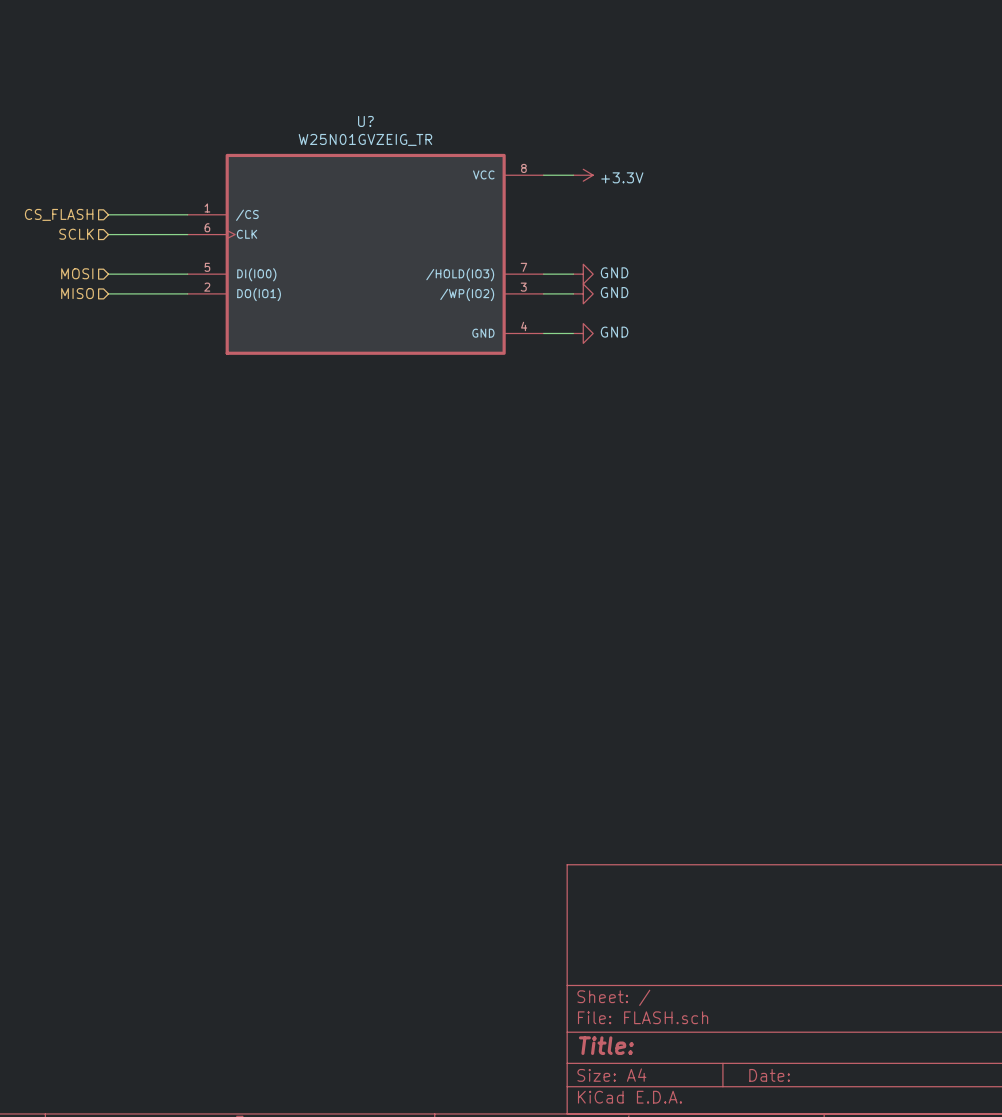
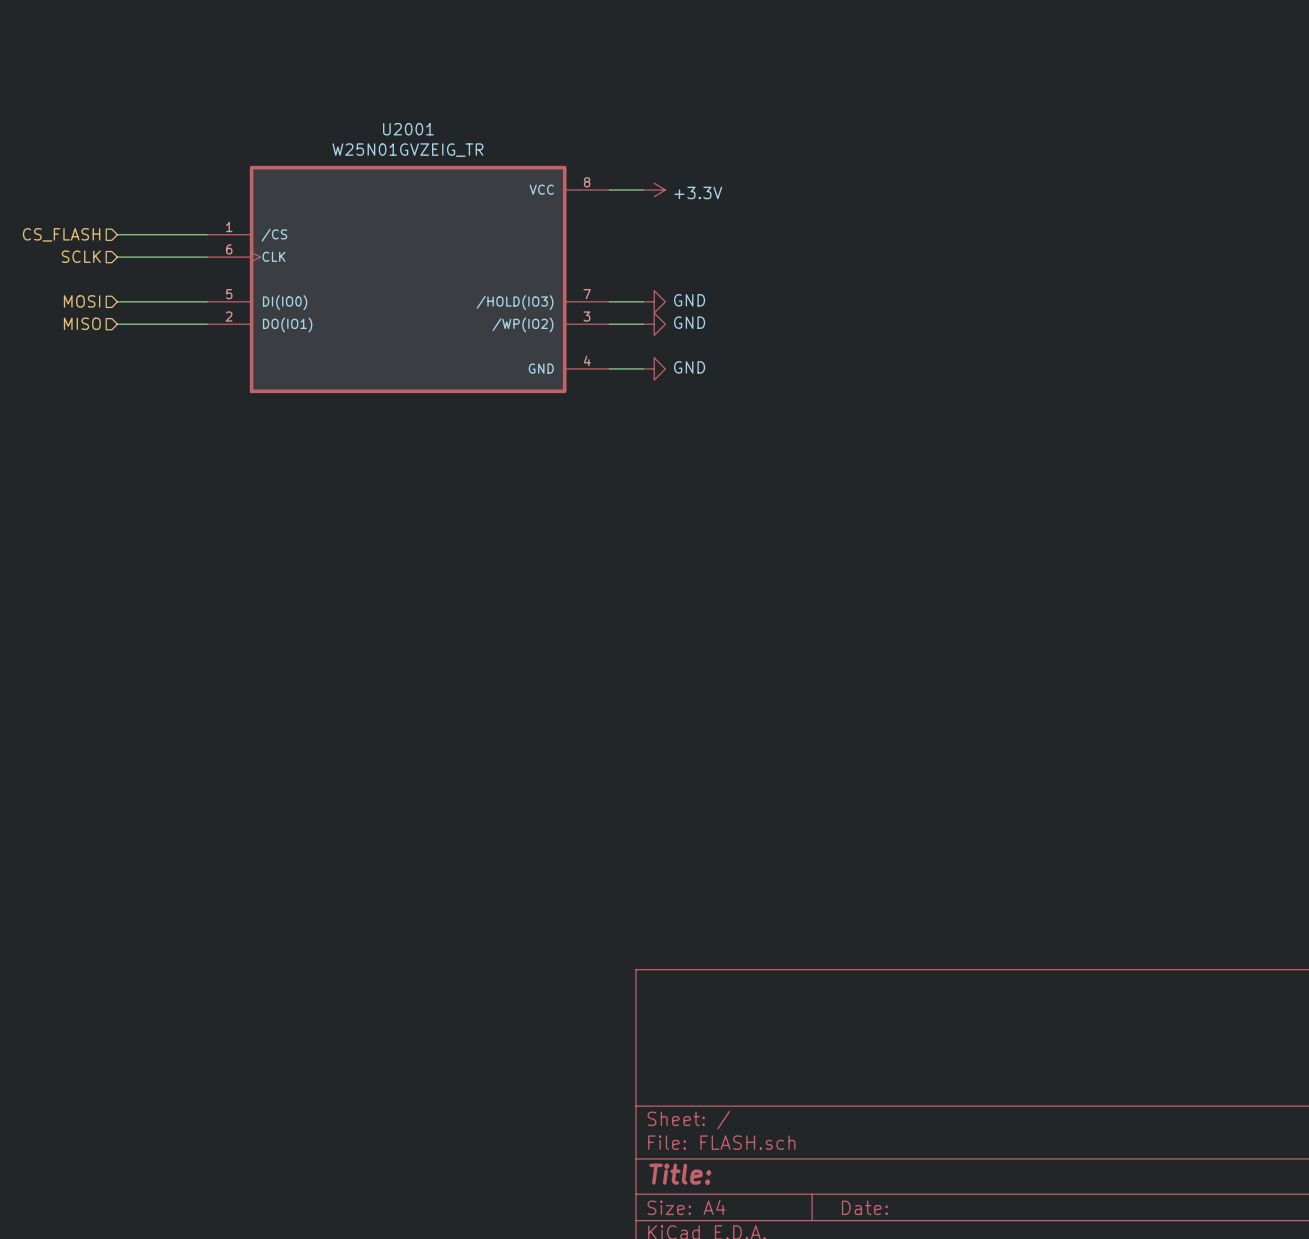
U? name: U? (365, 121) -> U2001 (408, 129)

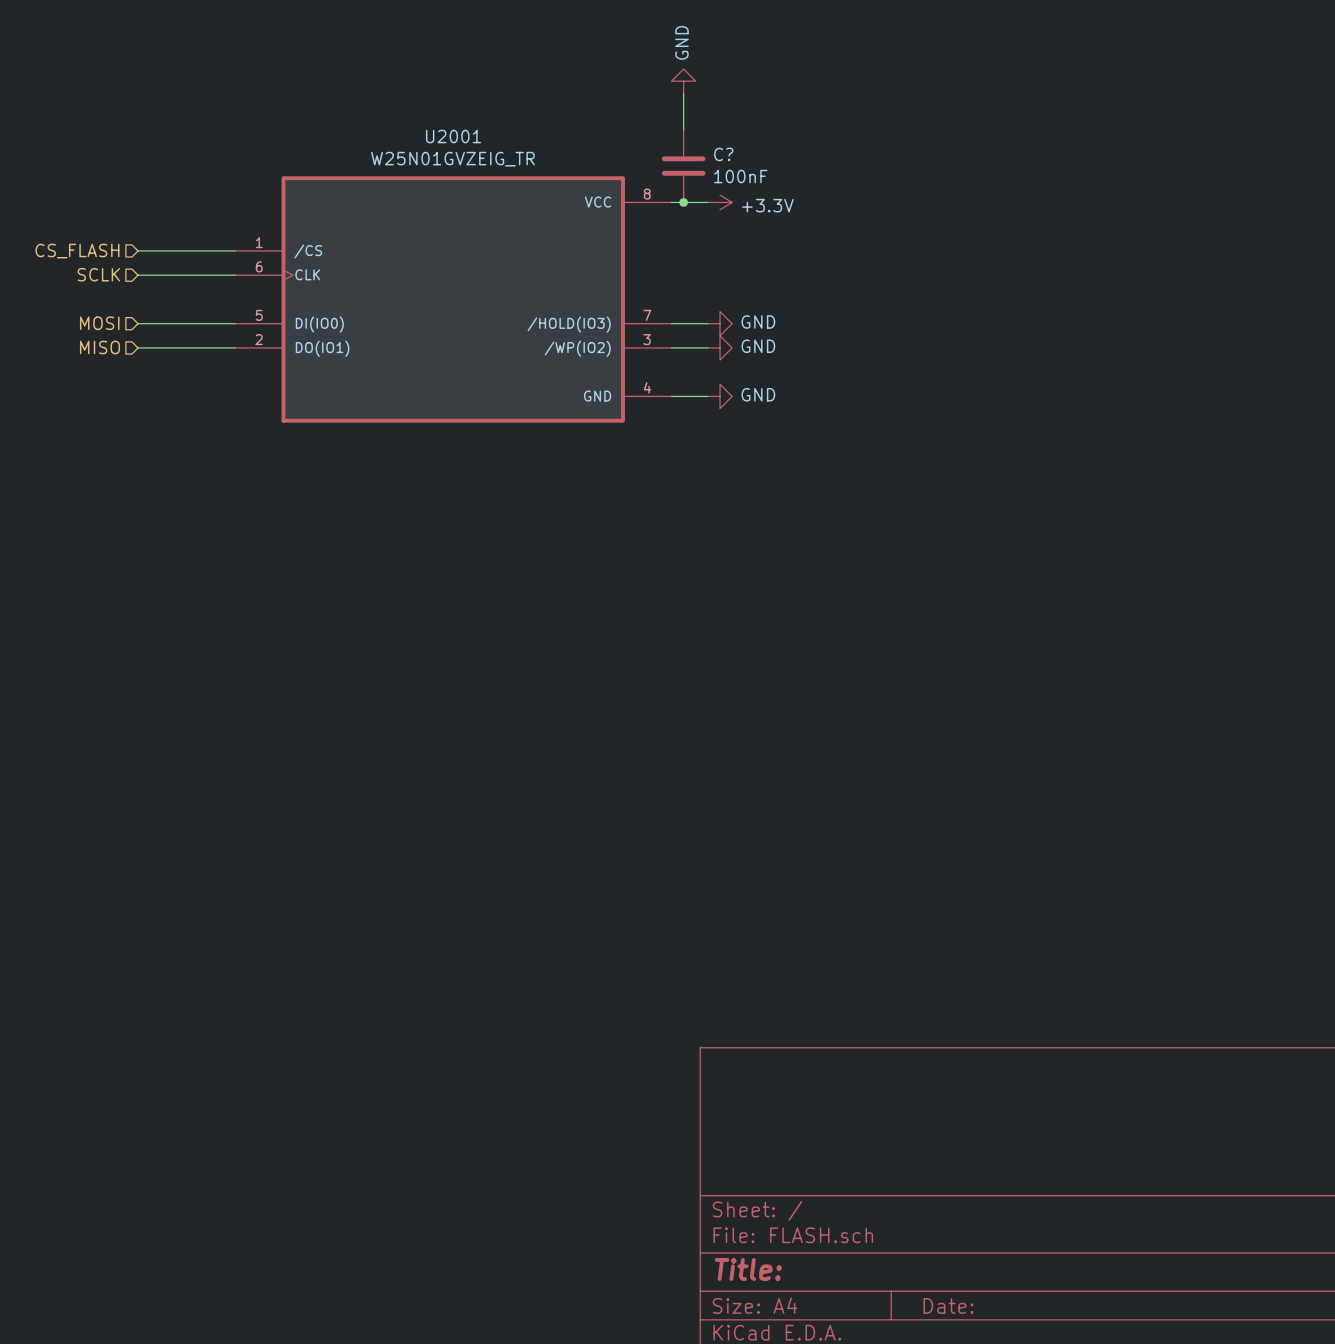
power symbol: none -> GND (683, 81)
wire: none -> (683, 93) (683, 129)
C?: none -> 100nF (683, 166)
junction: none -> (683, 202)

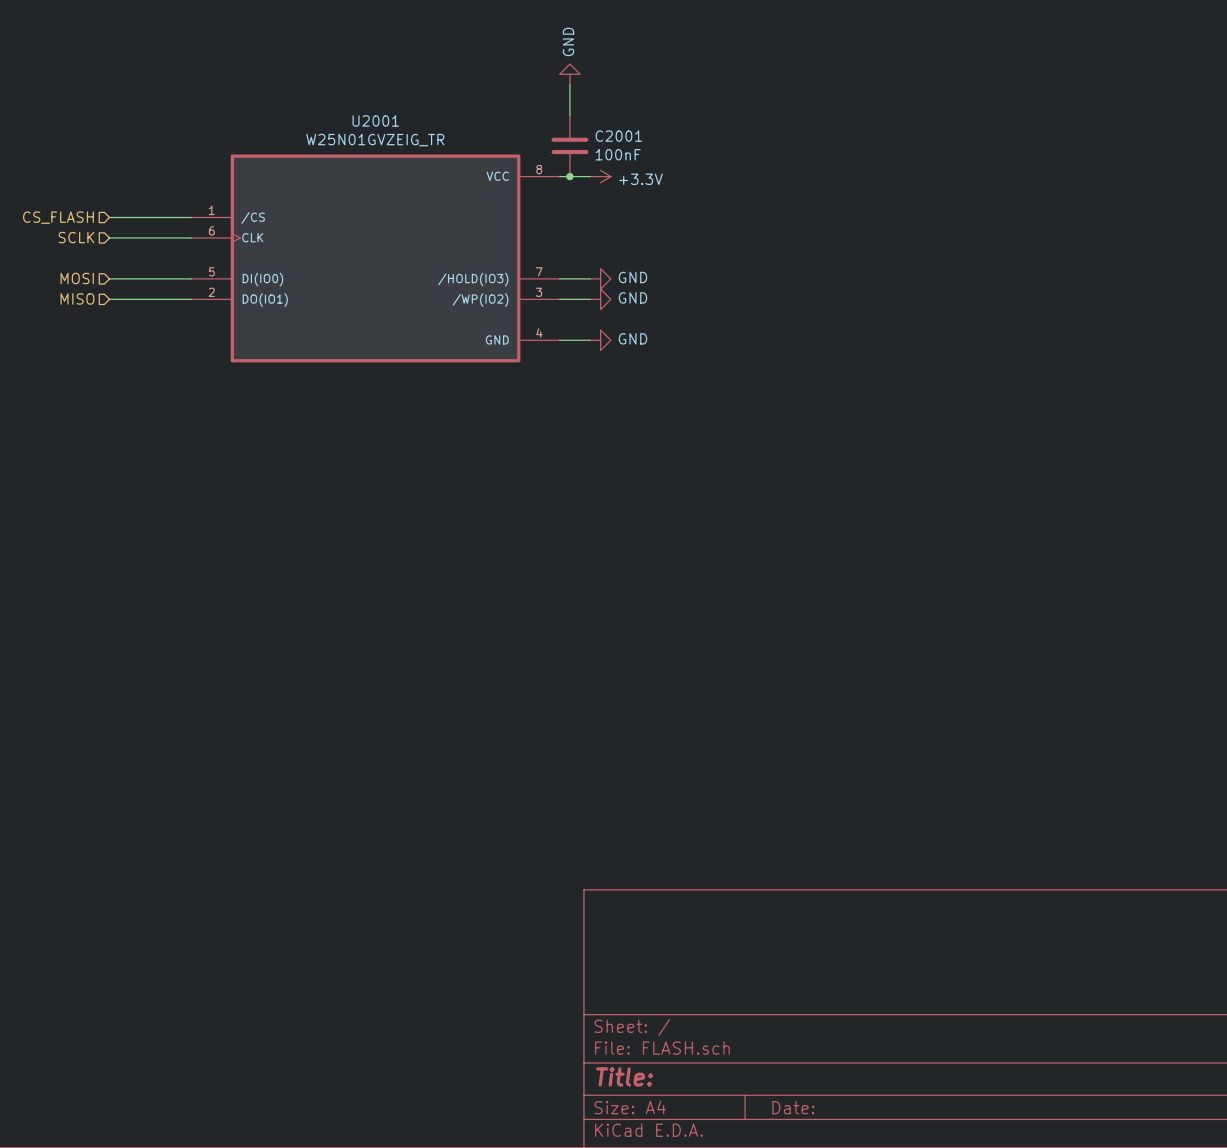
C? name: C? (723, 154) -> C2001 (618, 136)

